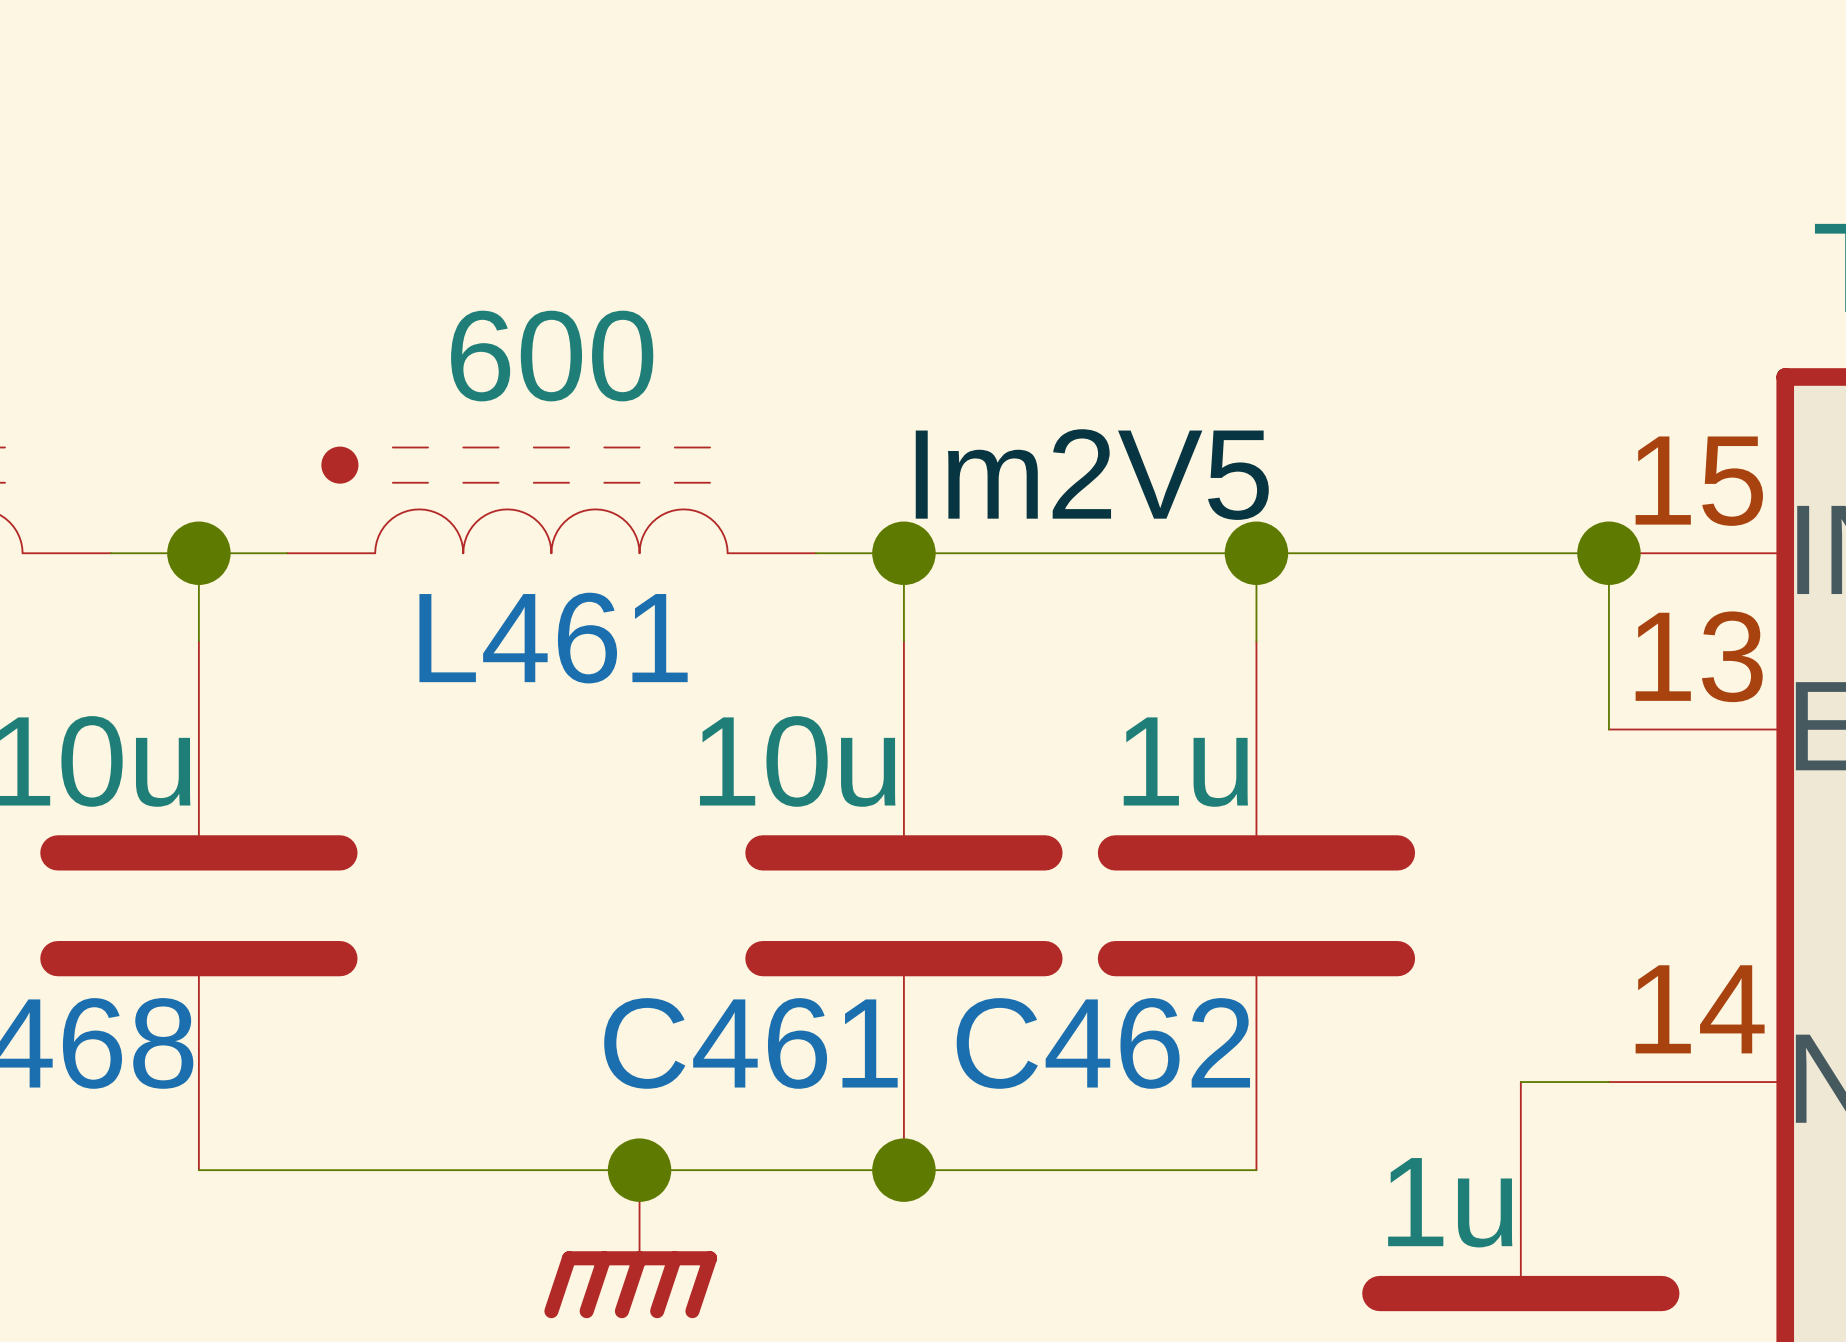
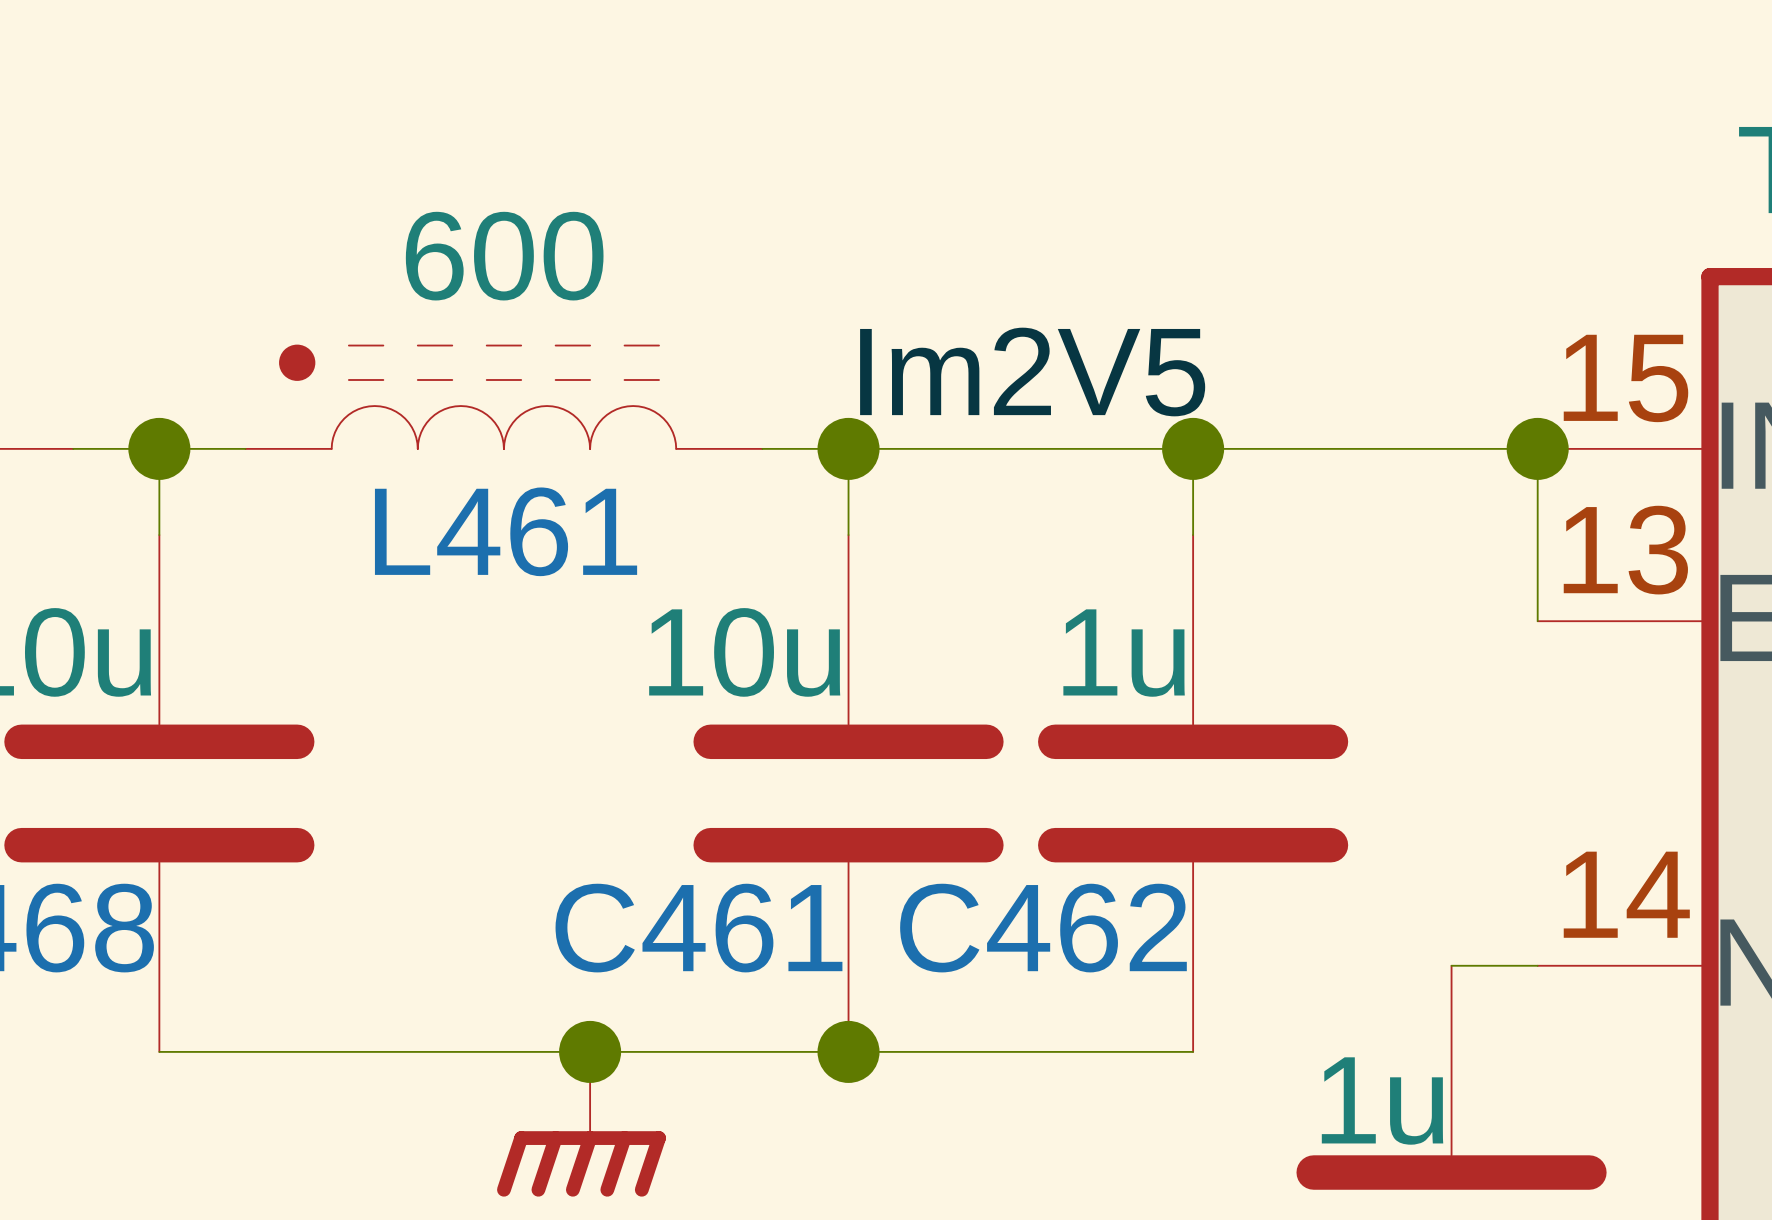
part value position: 1u (1450, 1202) -> 1u (1382, 1101)

